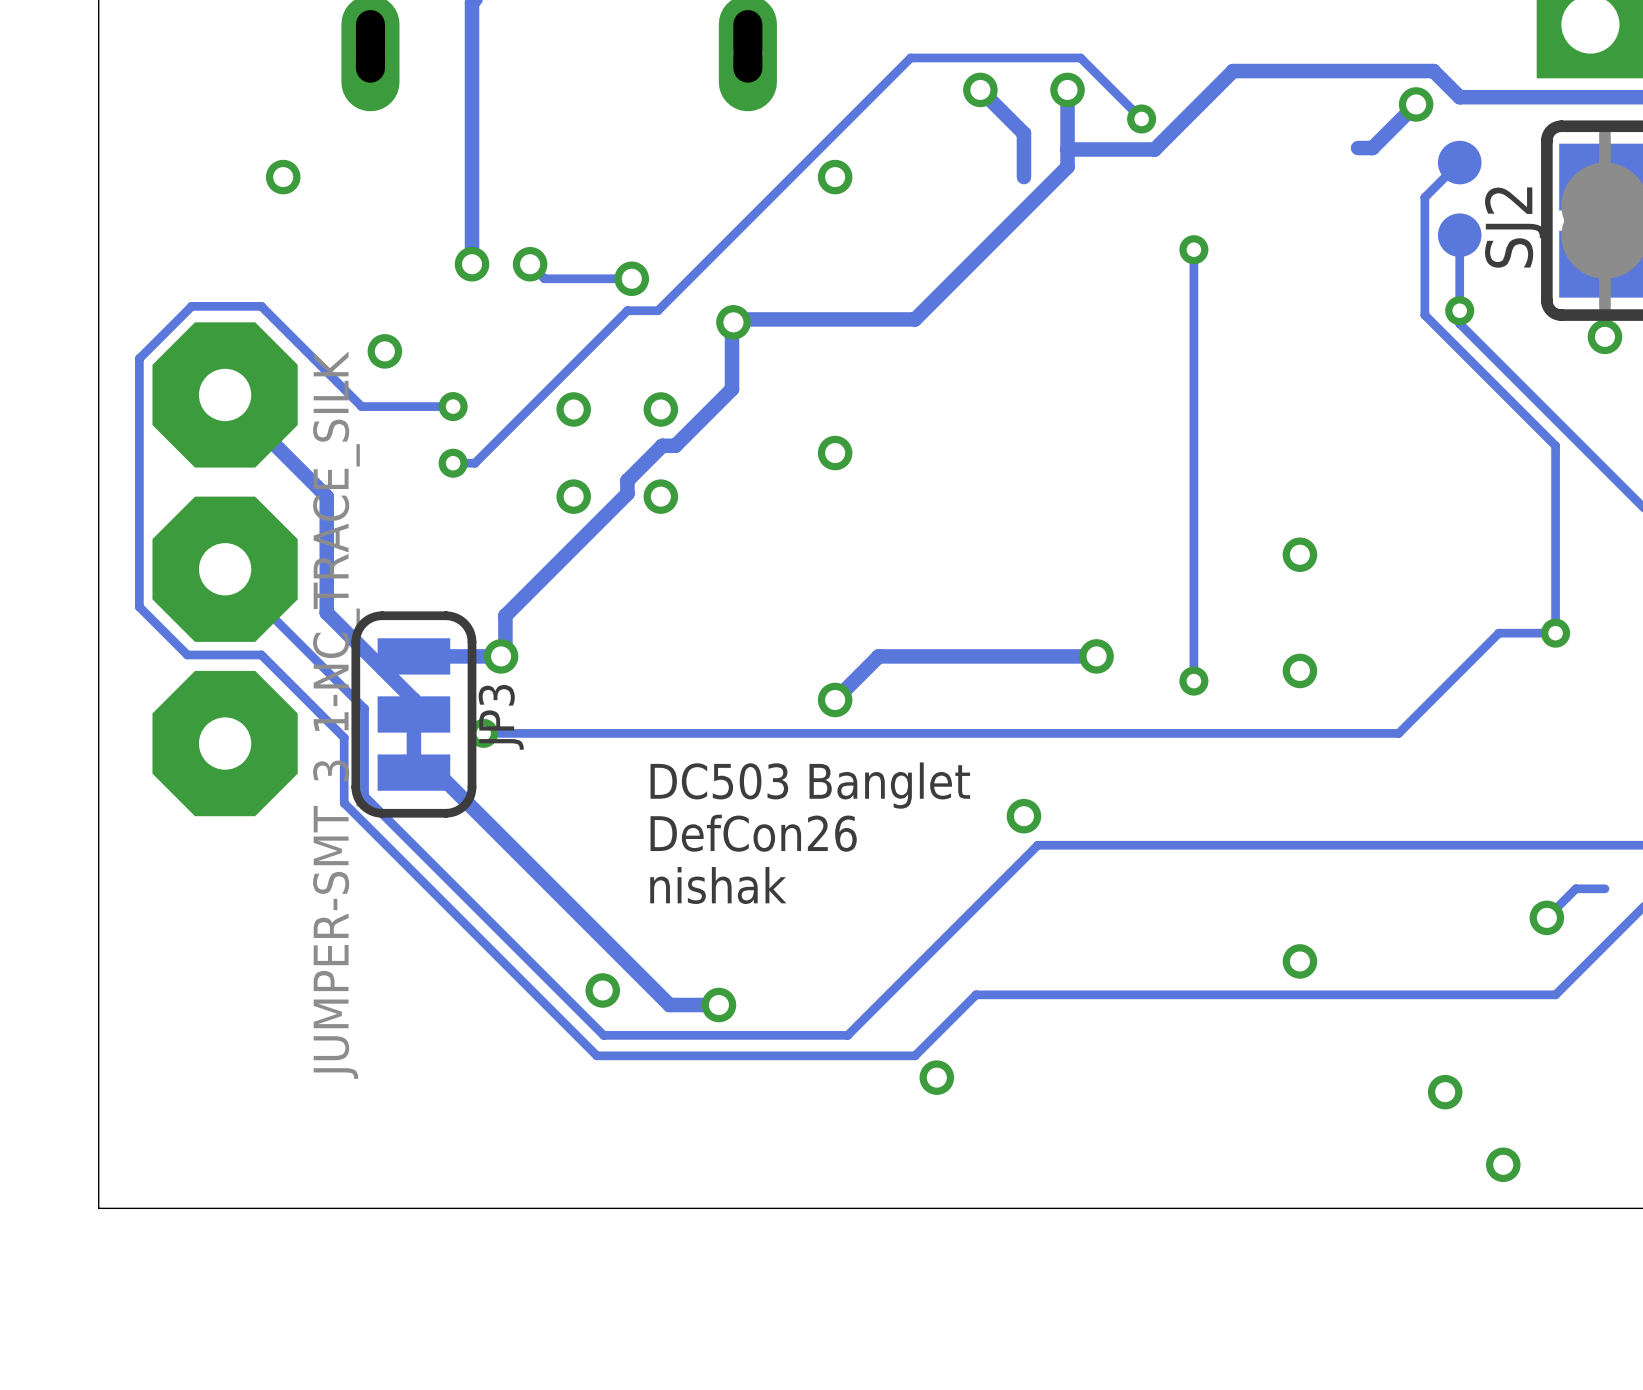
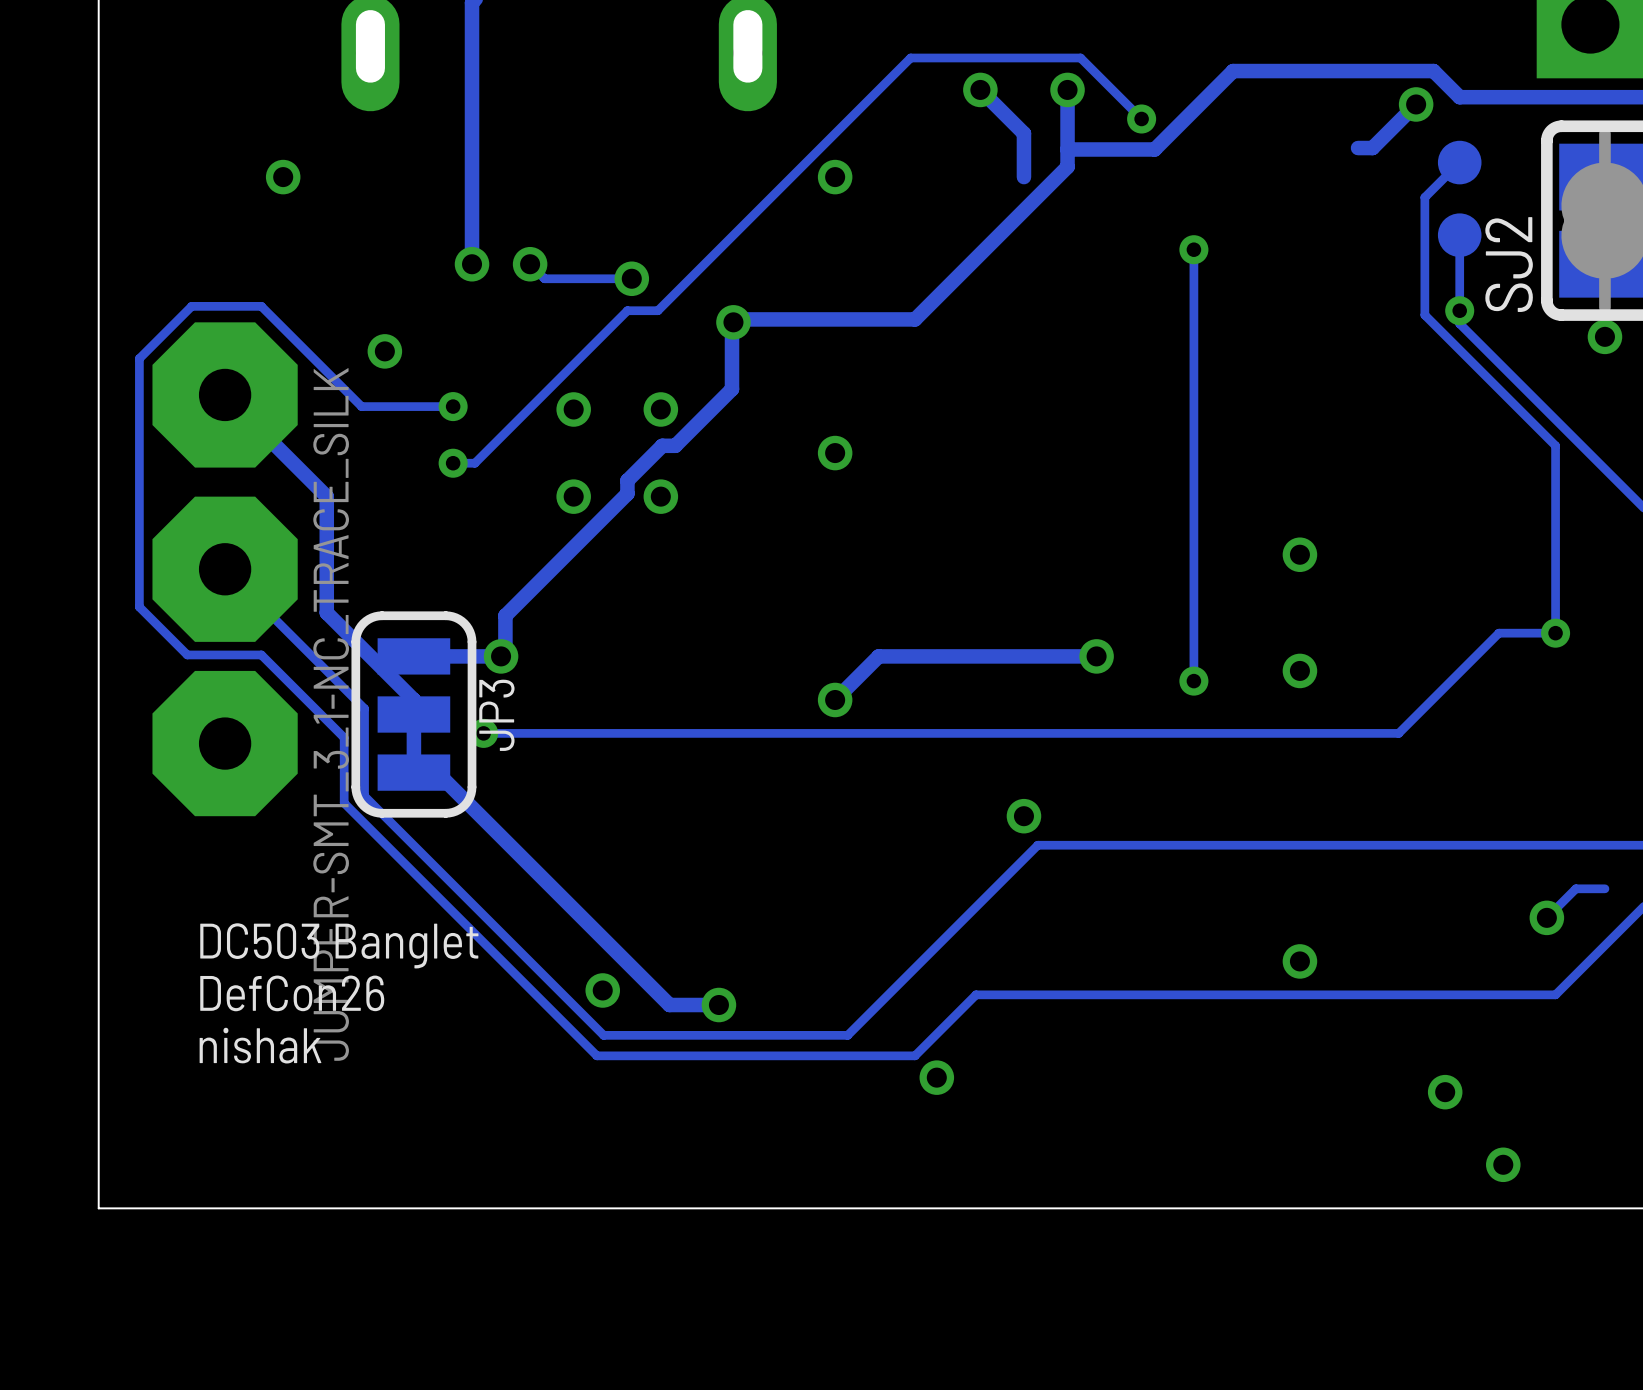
SJ2 name position: SJ2 (1515, 227) -> SJ2 (1509, 264)
text position: DC503 Banglet (810, 785) -> DC503 Banglet (339, 945)
text position: DefCon26 (753, 833) -> DefCon26 (292, 993)
text position: nishak (718, 885) -> nishak (260, 1045)

